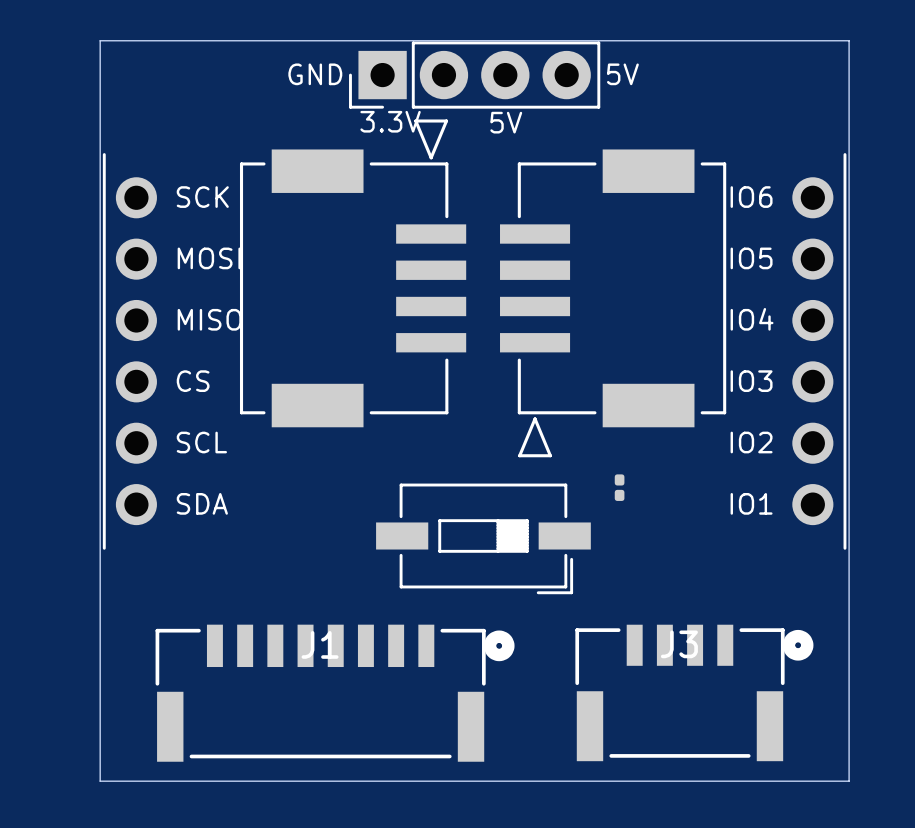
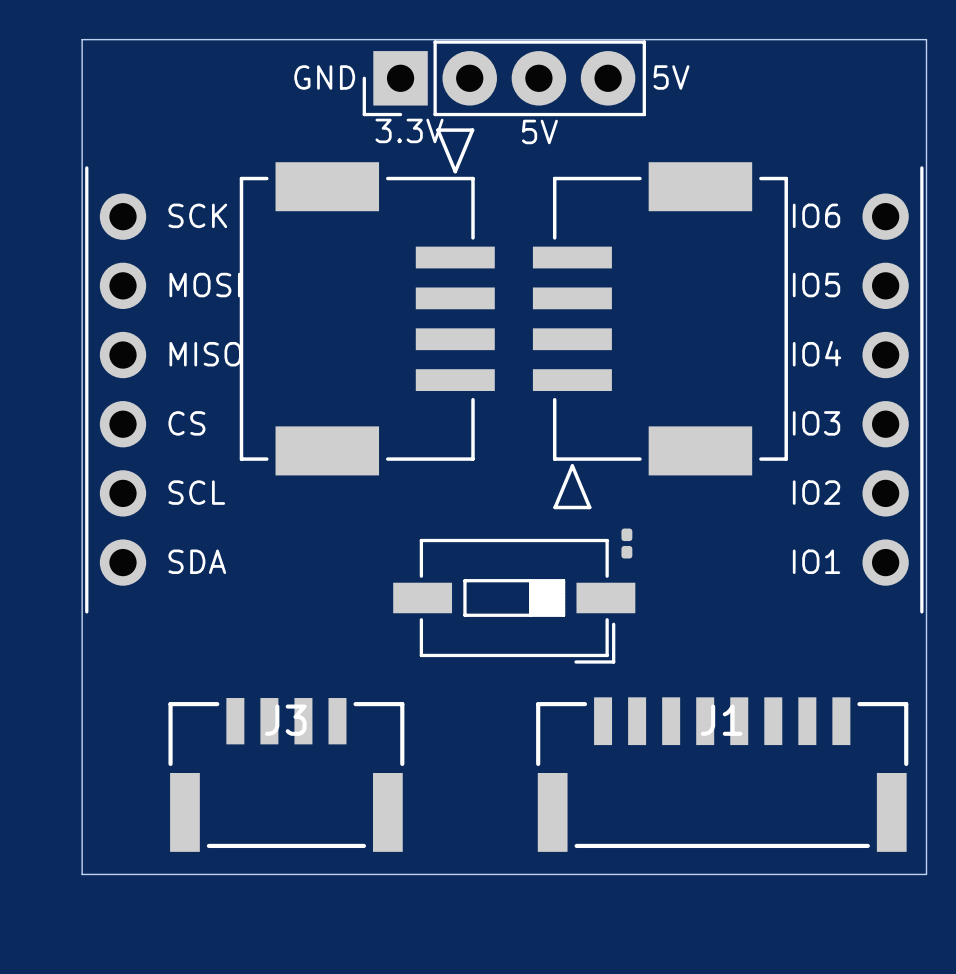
part position: (619, 487) -> (626, 543)
part footprint: [155, 624, 515, 762] -> [536, 697, 909, 852]
part footprint: [575, 624, 814, 762] -> [168, 698, 405, 852]

